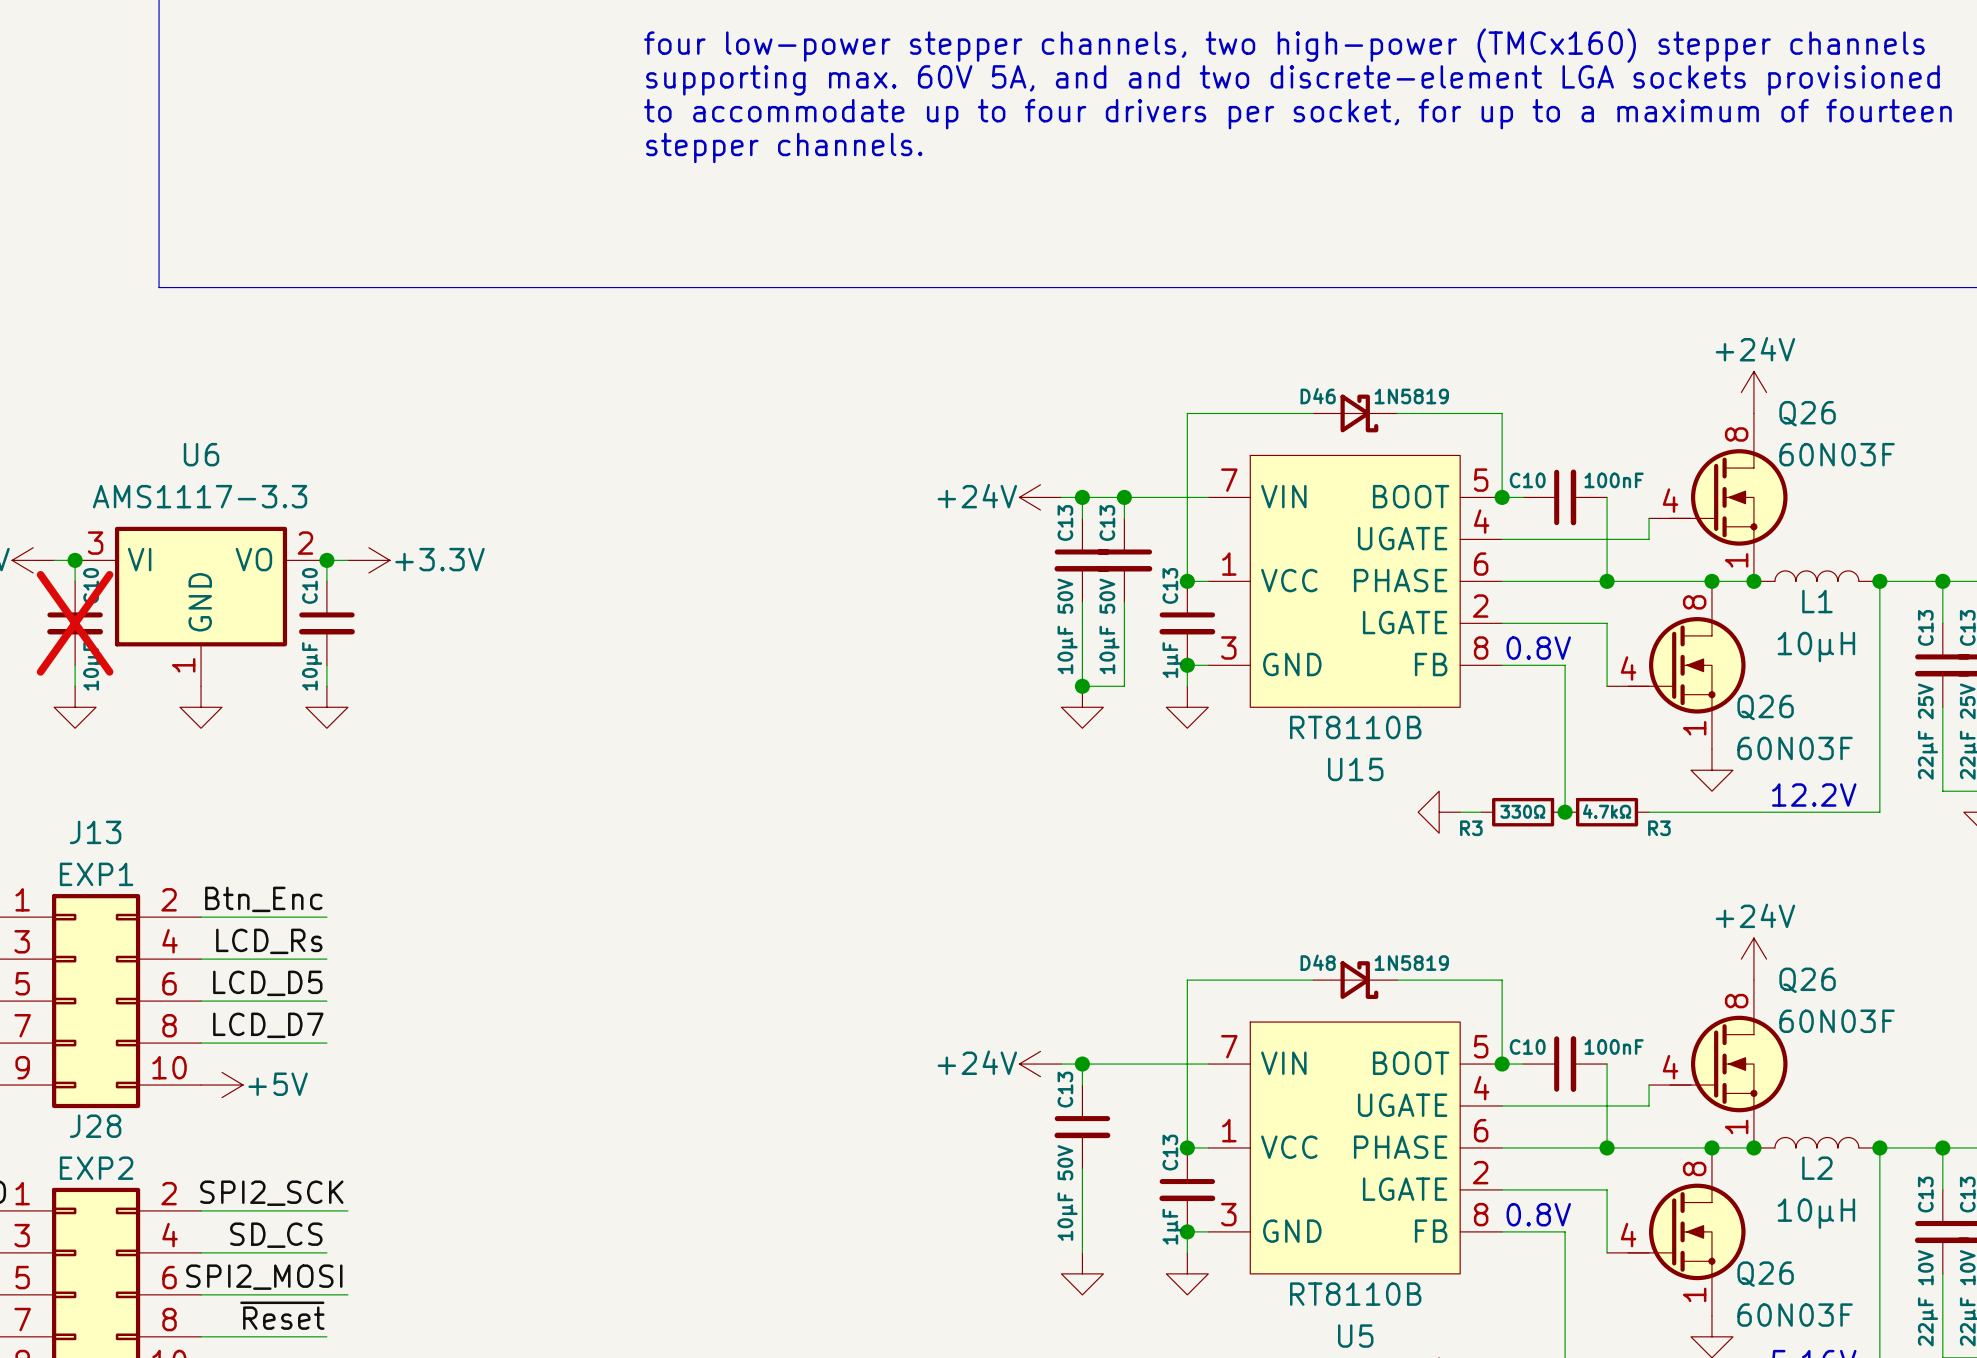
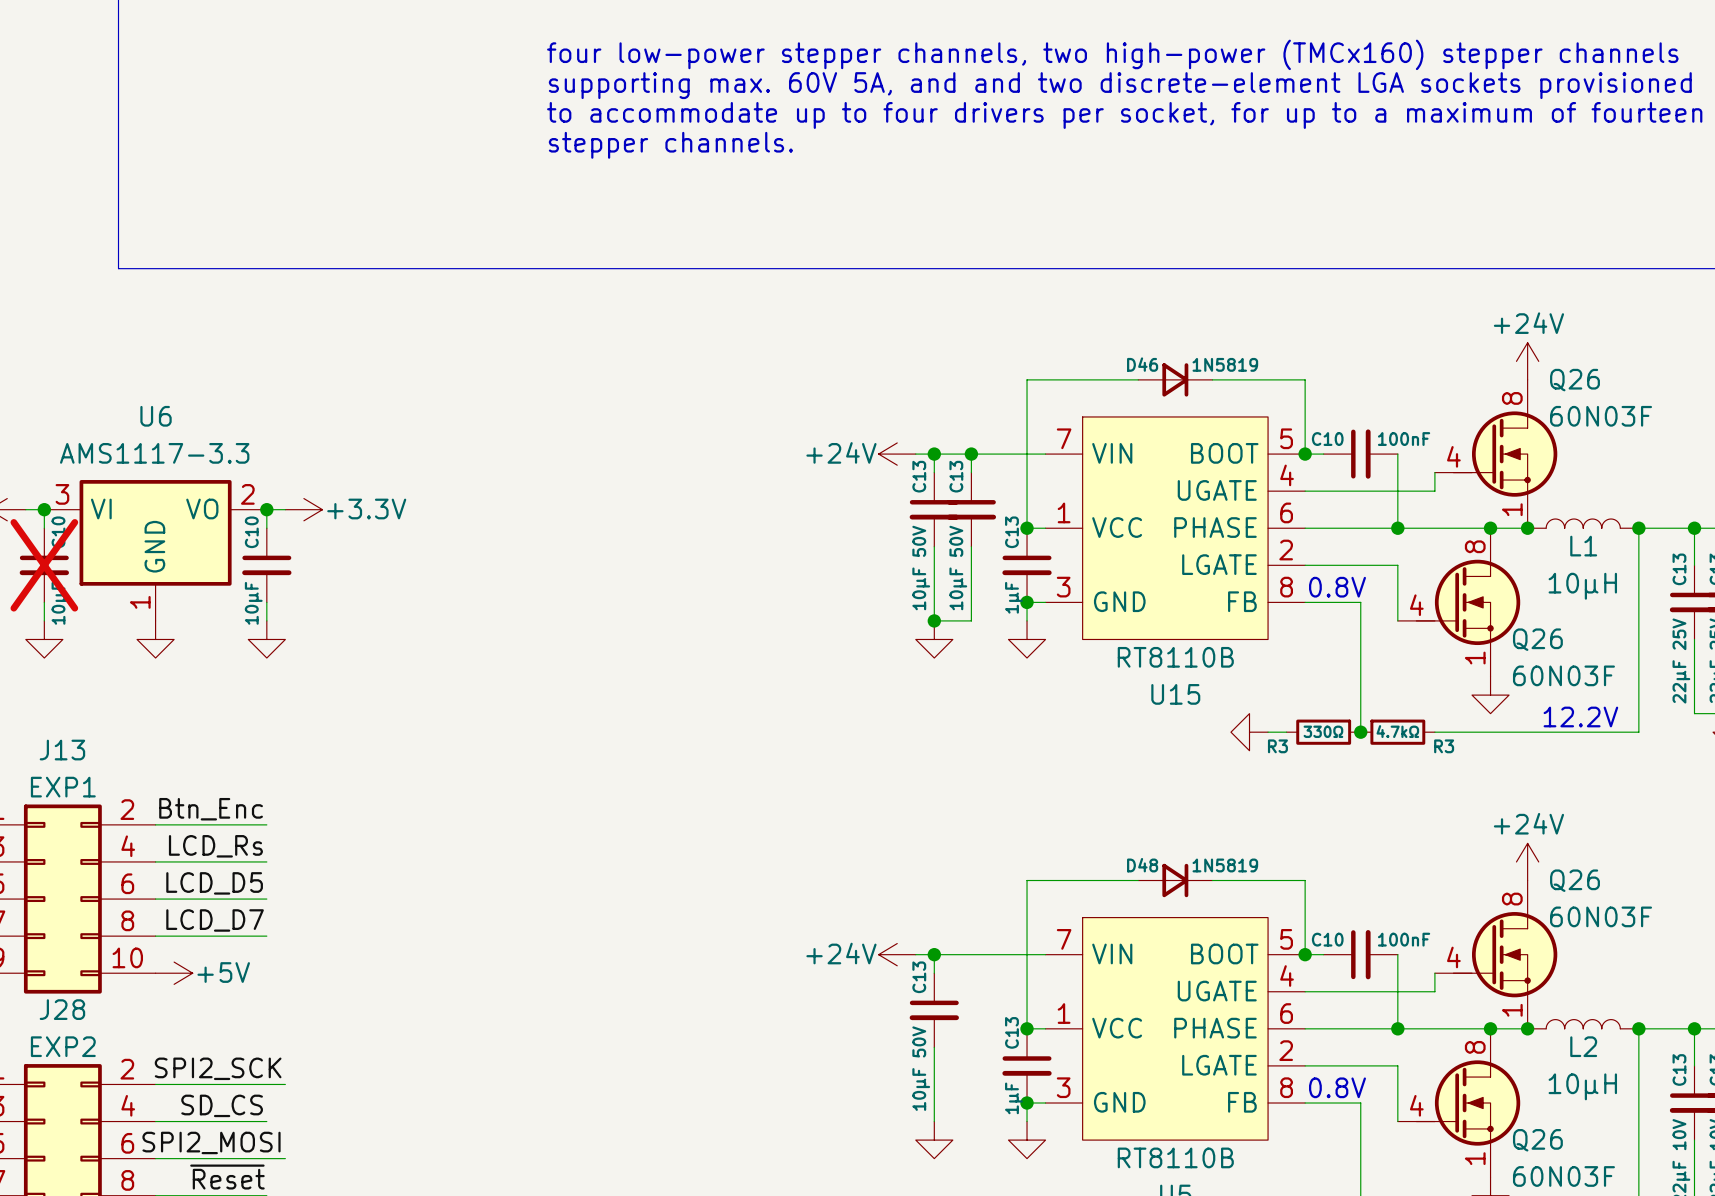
D46 symbol: [1313, 394, 1398, 433] -> [1138, 363, 1213, 397]
D48 symbol: [1313, 961, 1398, 999] -> [1138, 863, 1213, 898]

